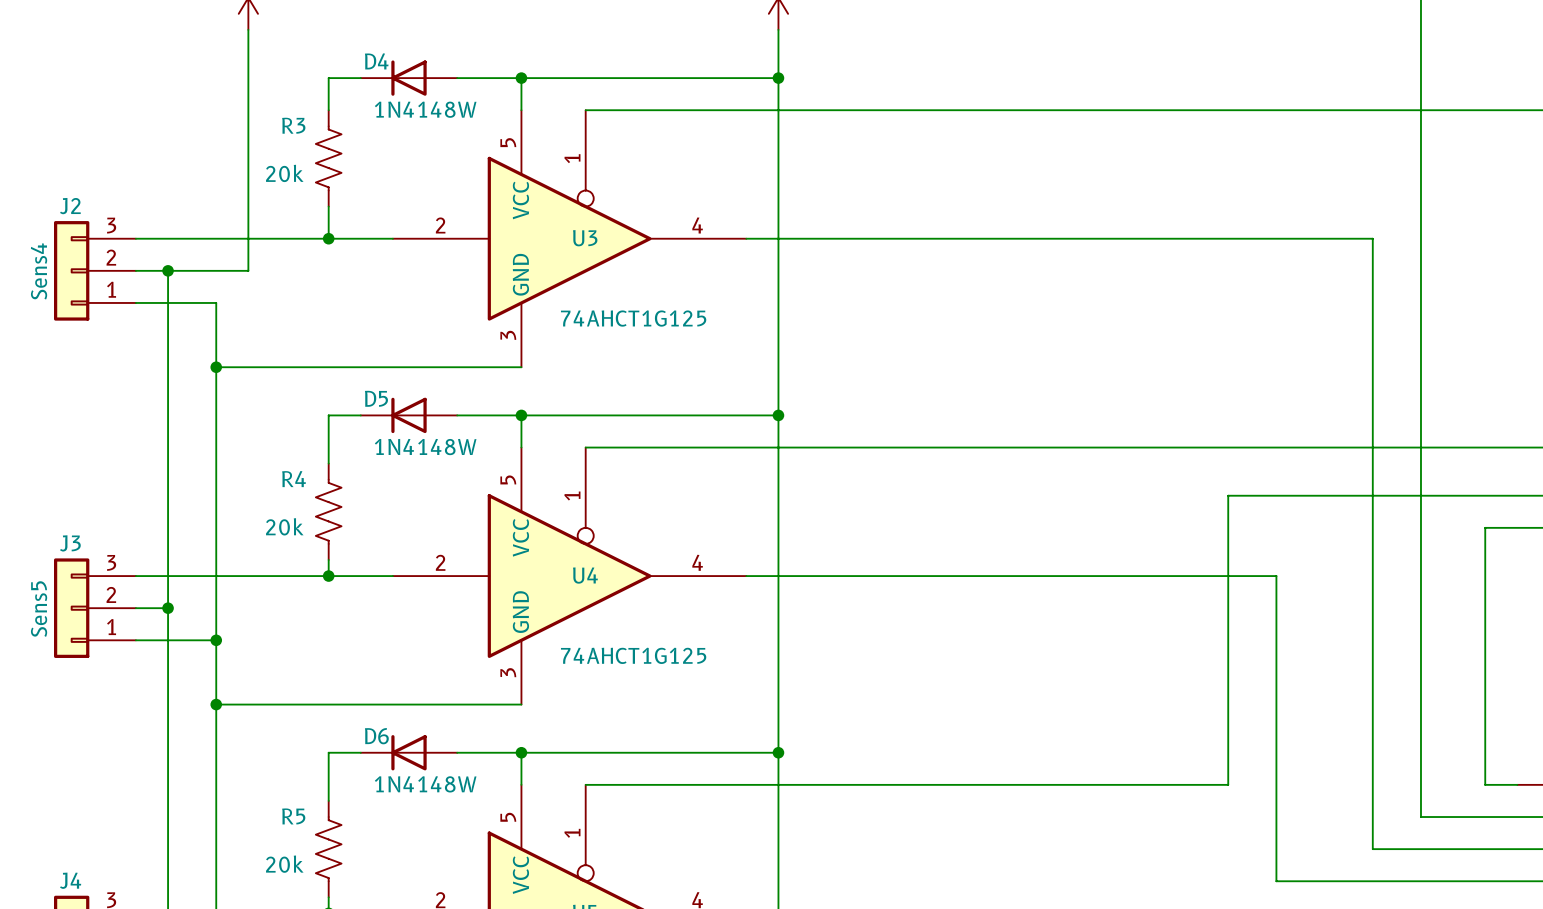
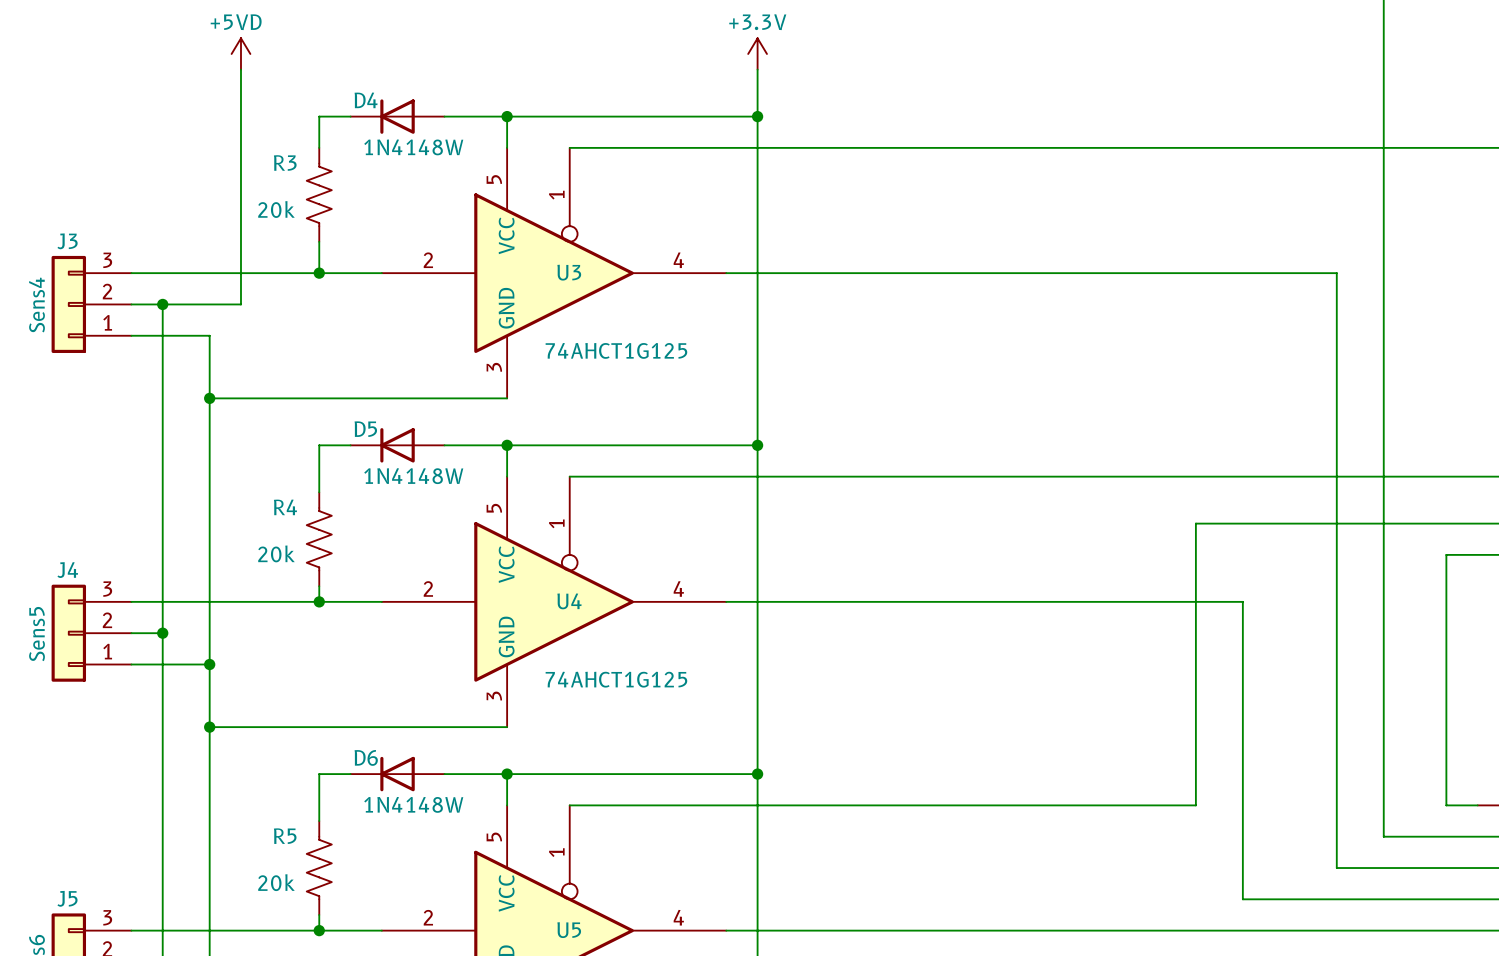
J2 name: J2 (70, 206) -> J3 (67, 241)
J3 name: J3 (70, 543) -> J4 (67, 570)
J4 name: J4 (70, 880) -> J5 (67, 898)

